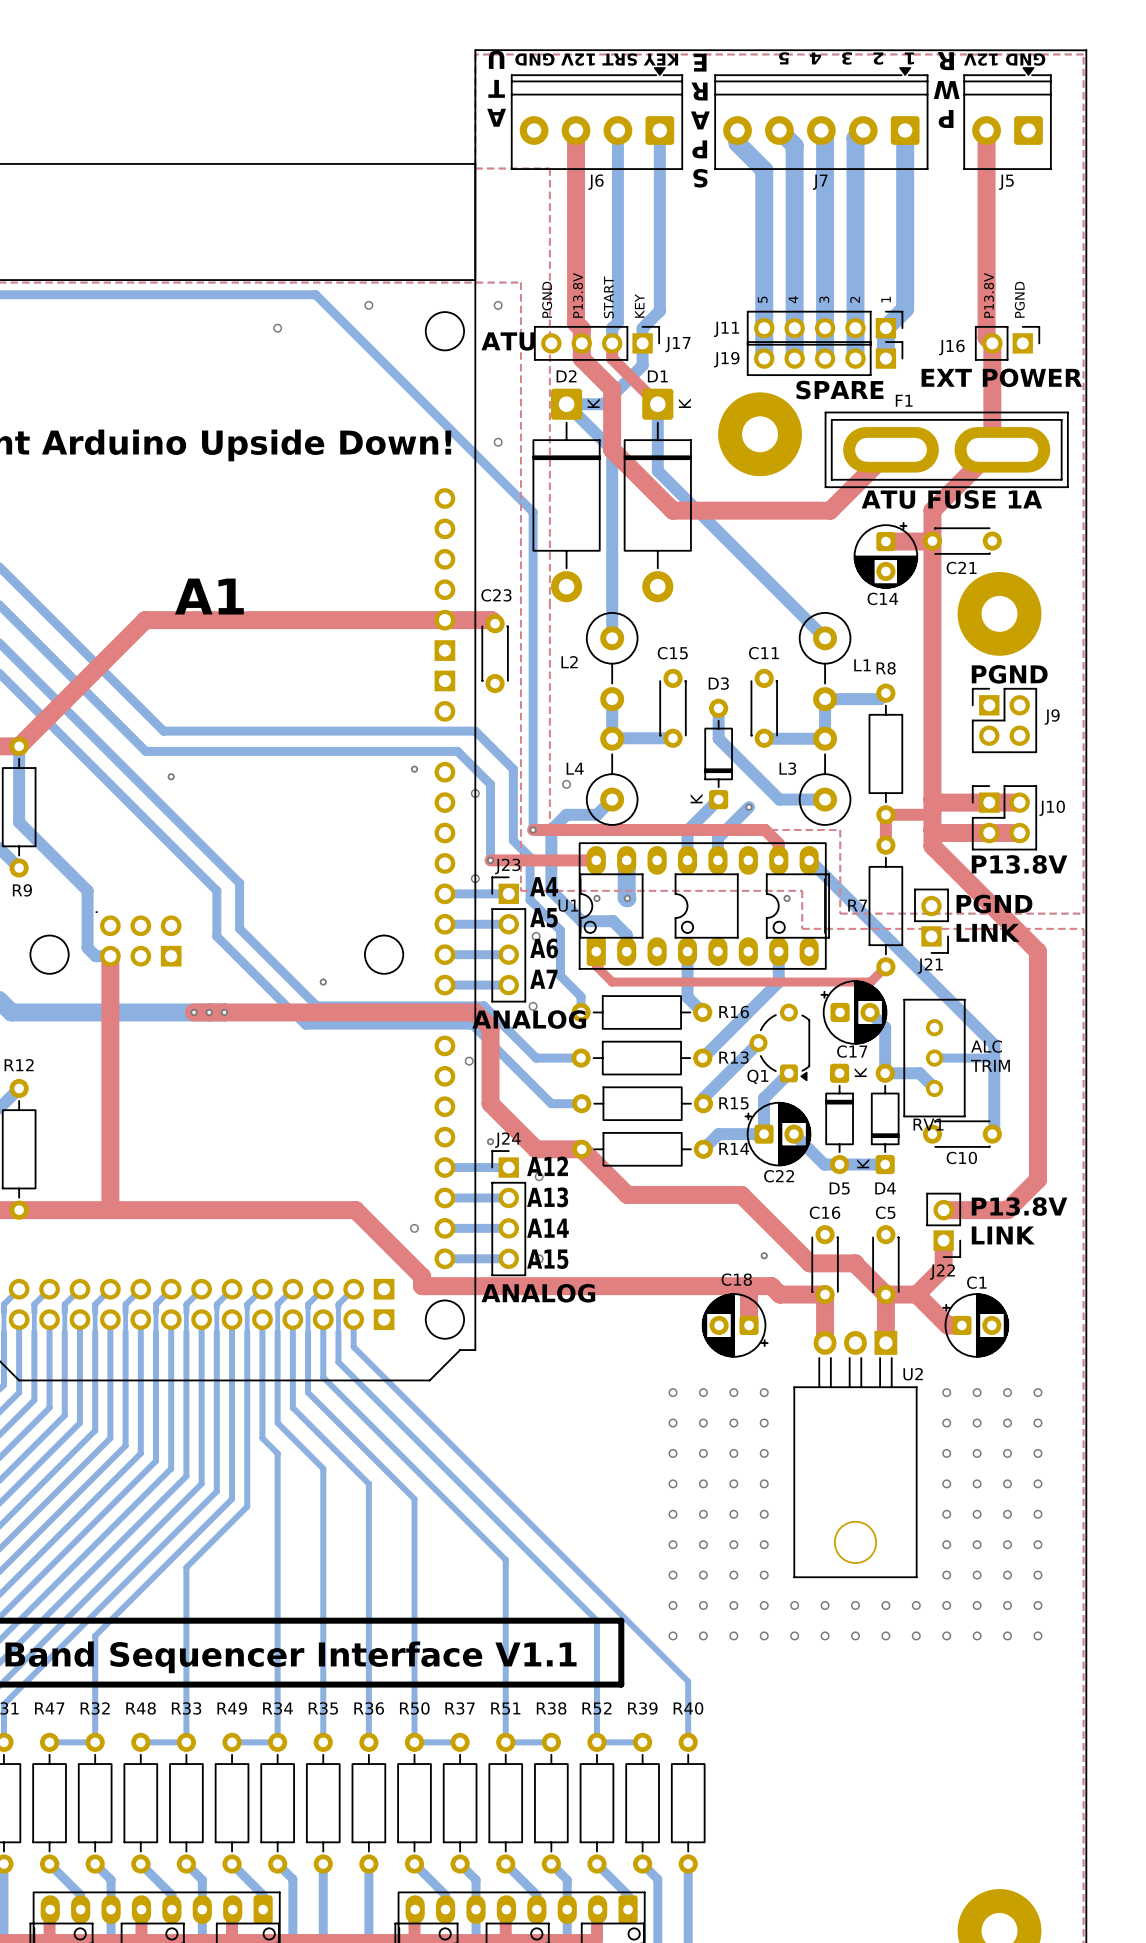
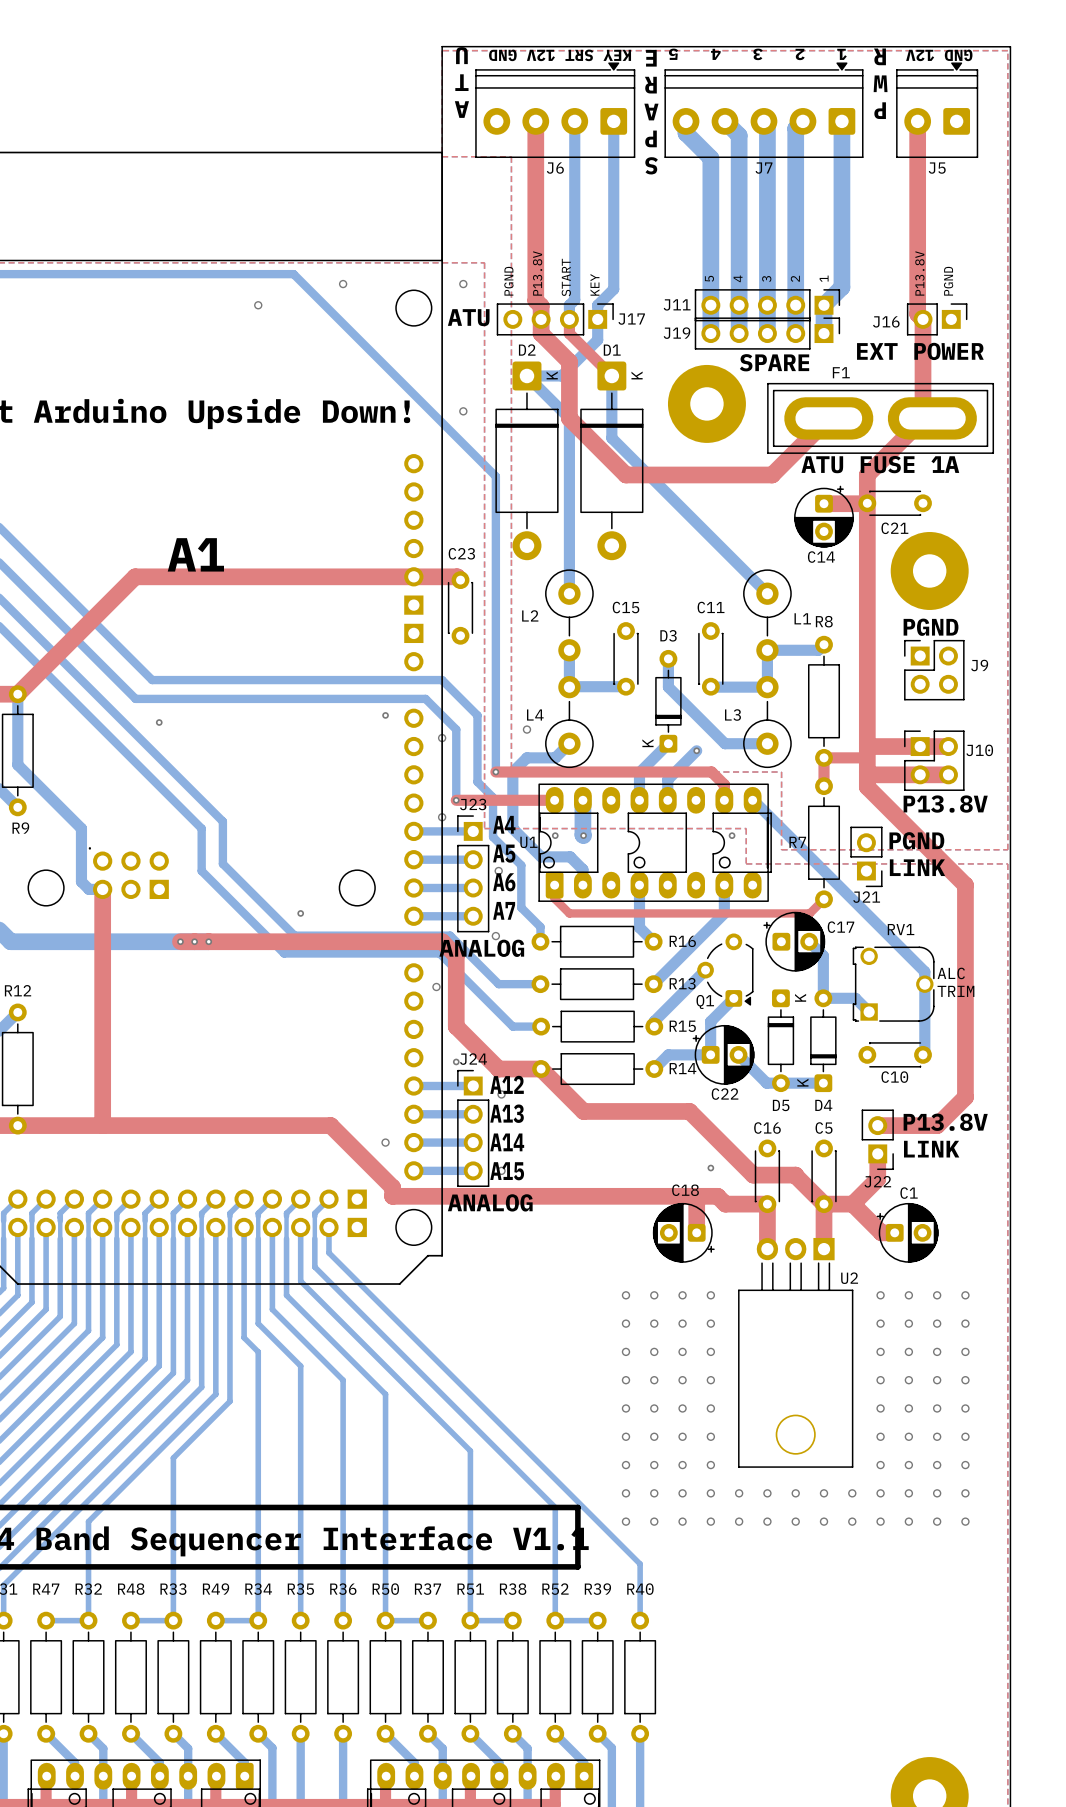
RV1 footprint: [903, 998, 966, 1118] -> [852, 946, 935, 1022]
text position: ALC (986, 1046) -> ALC (951, 973)
C17 name position: C17 (852, 1051) -> C17 (840, 927)
bottom track: (934, 1058) (994, 1058) -> none
text position: TRIM (990, 1065) -> TRIM (955, 991)
RV1 name position: RV1 (928, 1124) -> RV1 (901, 929)

